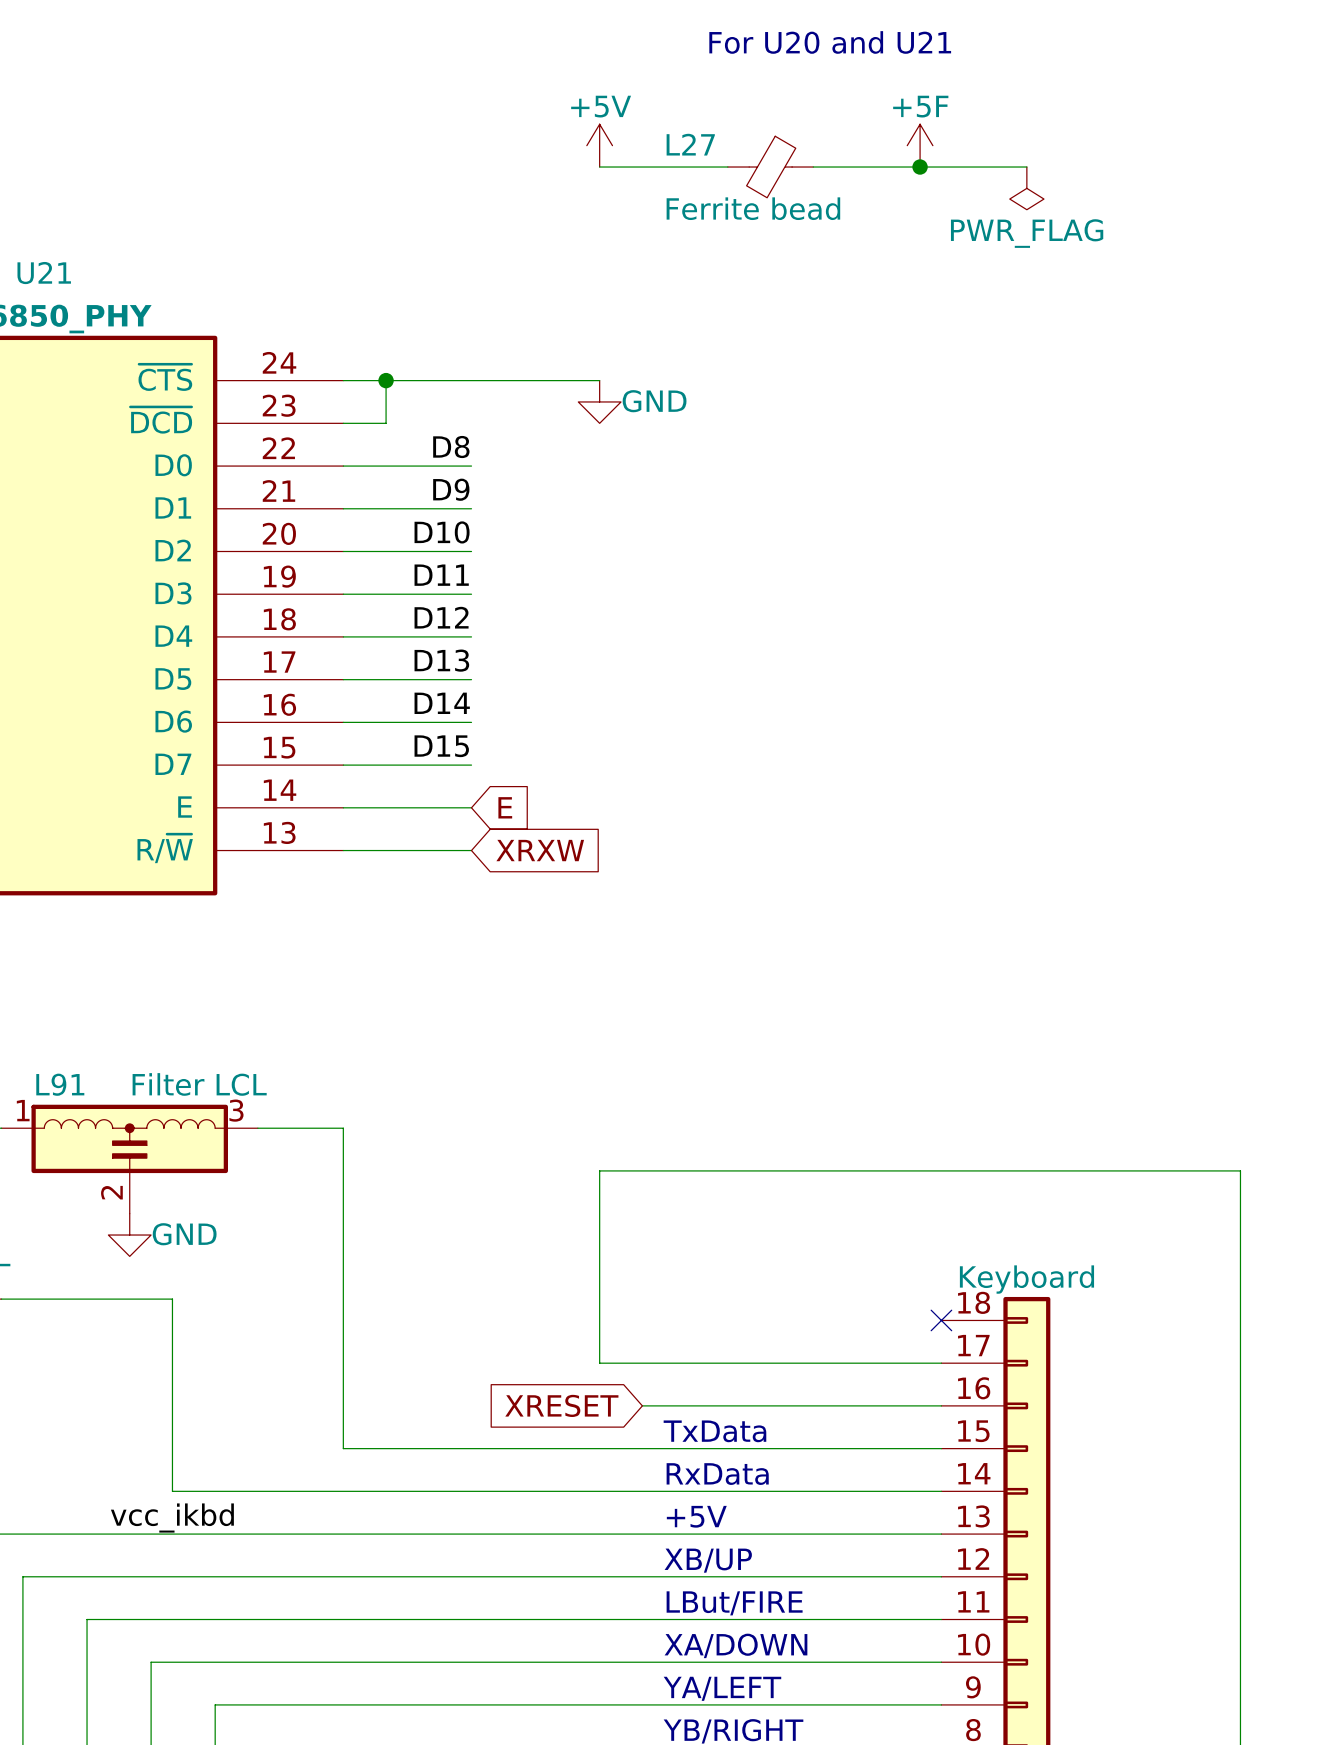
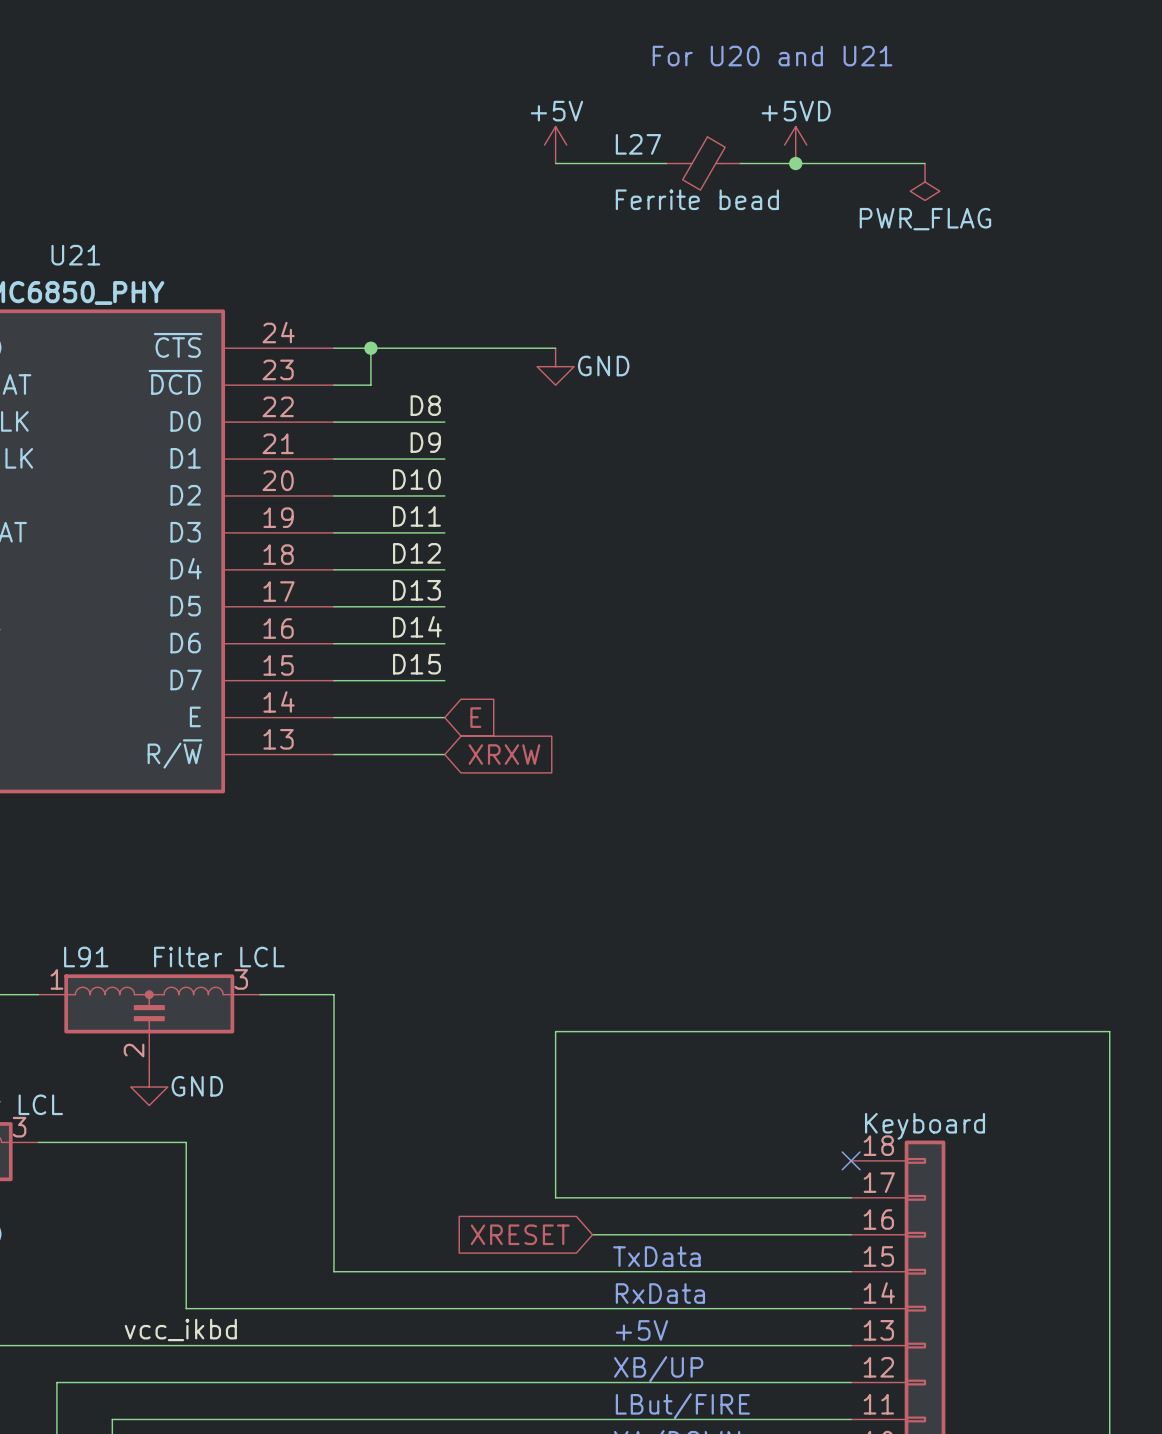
power symbol: none -> +5VD (795, 145)
power symbol: +5F (920, 145) -> none
junction position: (920, 167) -> (795, 163)

